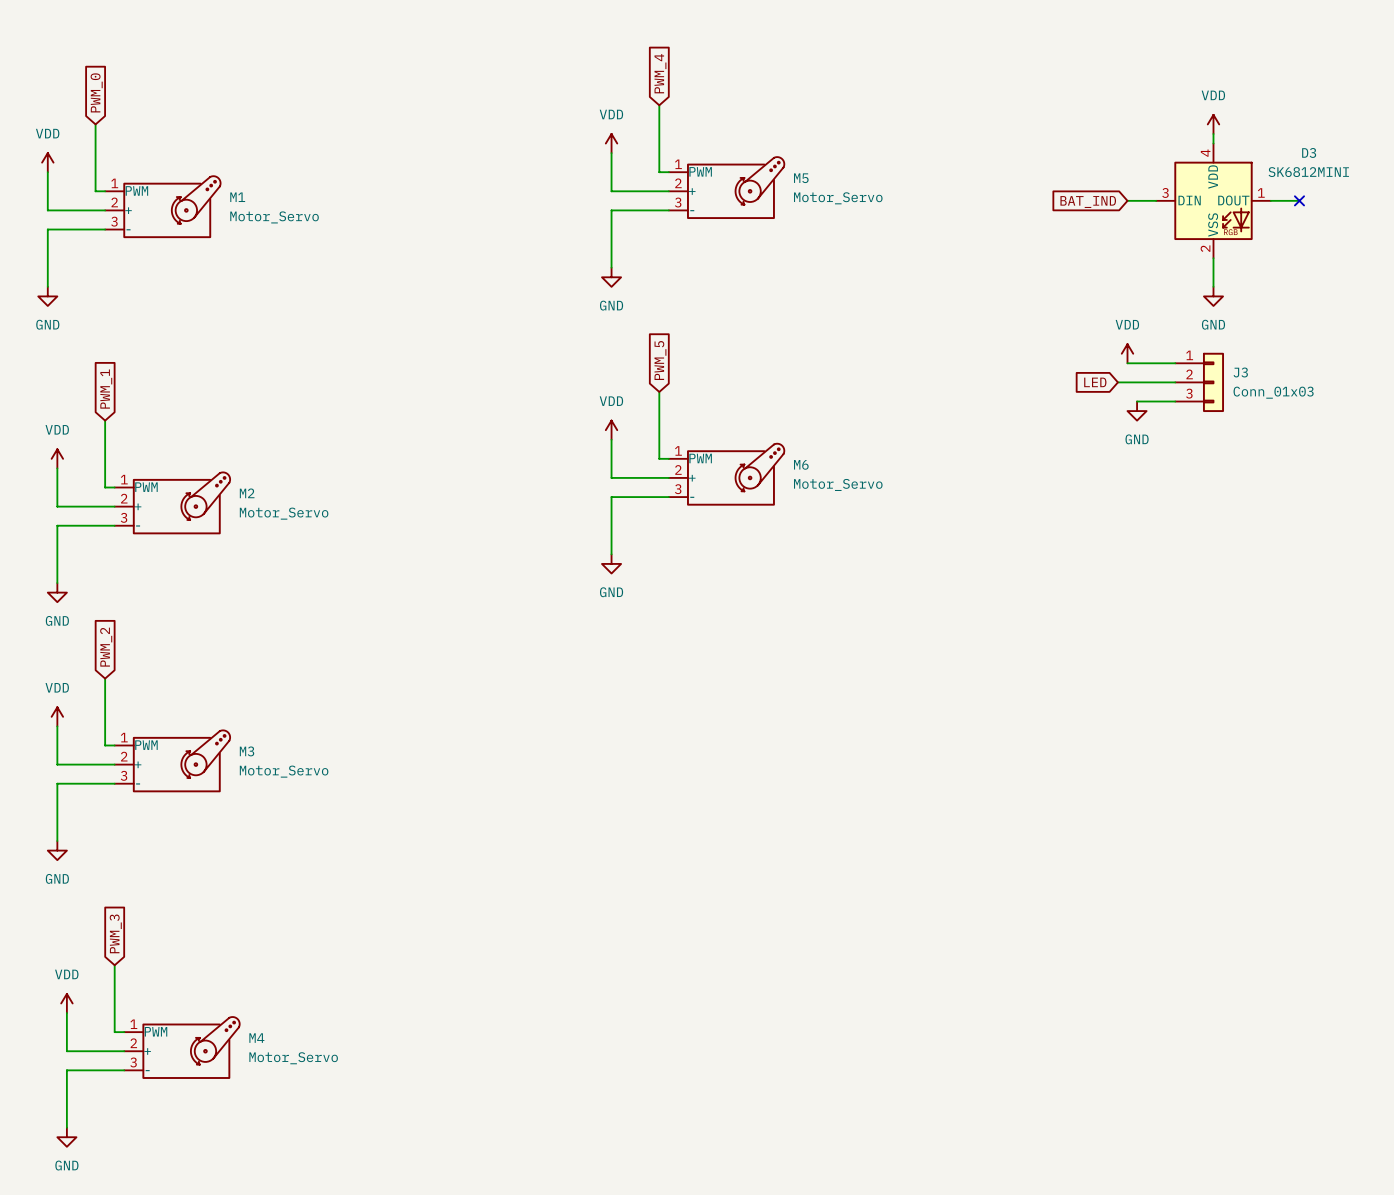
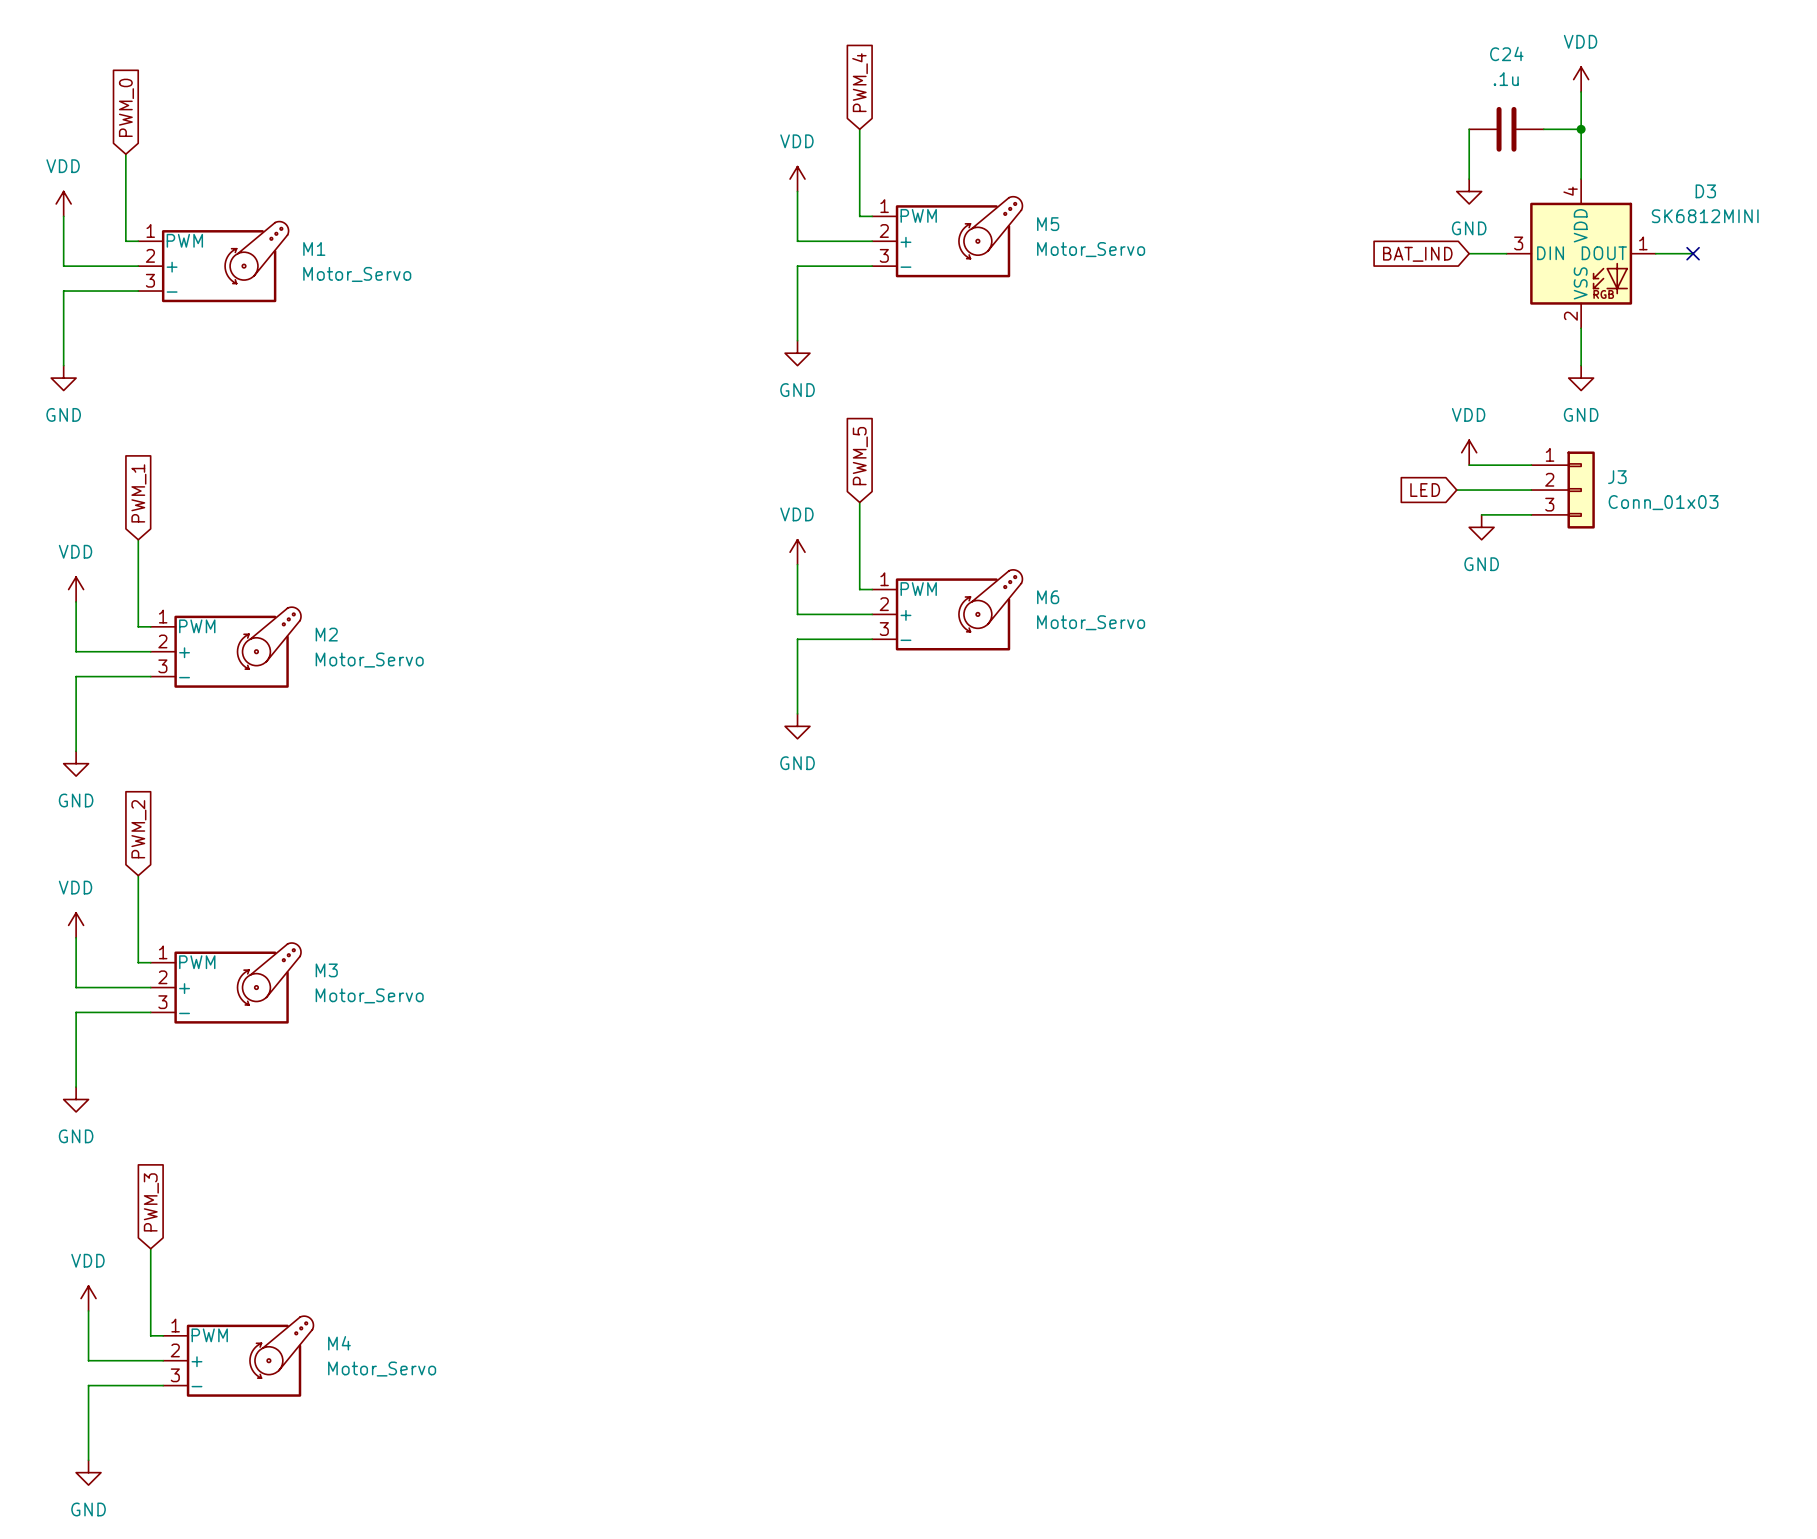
wire: none -> (1581, 92) (1581, 166)
wire: none -> (1469, 129) (1469, 179)
C24: none -> .1u (1506, 129)
wire: none -> (1543, 129) (1581, 129)
junction: none -> (1581, 129)
power symbol position: VDD (1213, 124) -> VDD (1581, 79)
power symbol: none -> GND (1469, 191)

